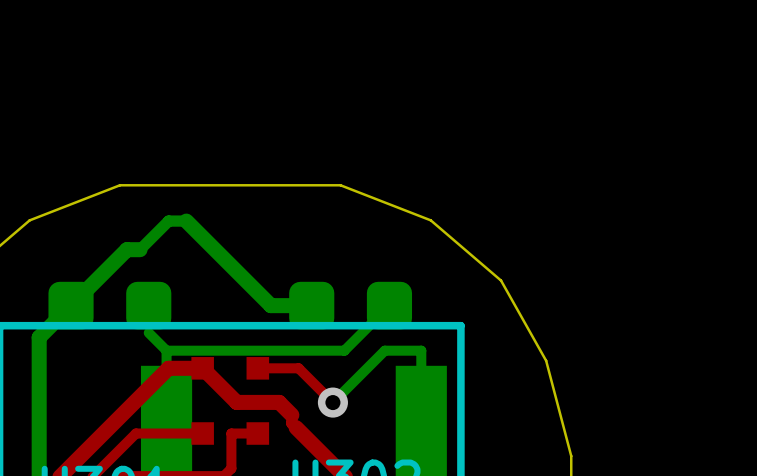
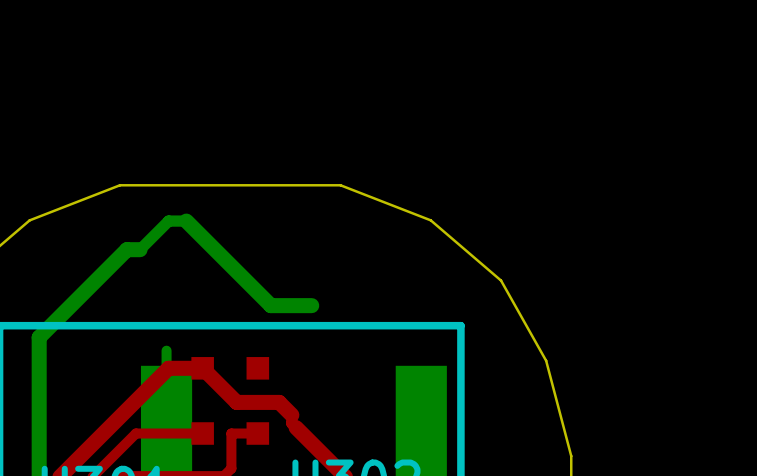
part: (109, 305) -> none
part: (350, 305) -> none
bottom track: (389, 305) (344, 350) (166, 350) (148, 332) -> none
top track: (257, 368) (298, 368) (332, 402) -> none
bottom track: (332, 402) (384, 350) (421, 350) (421, 446) -> none
via: (332, 402) -> none

